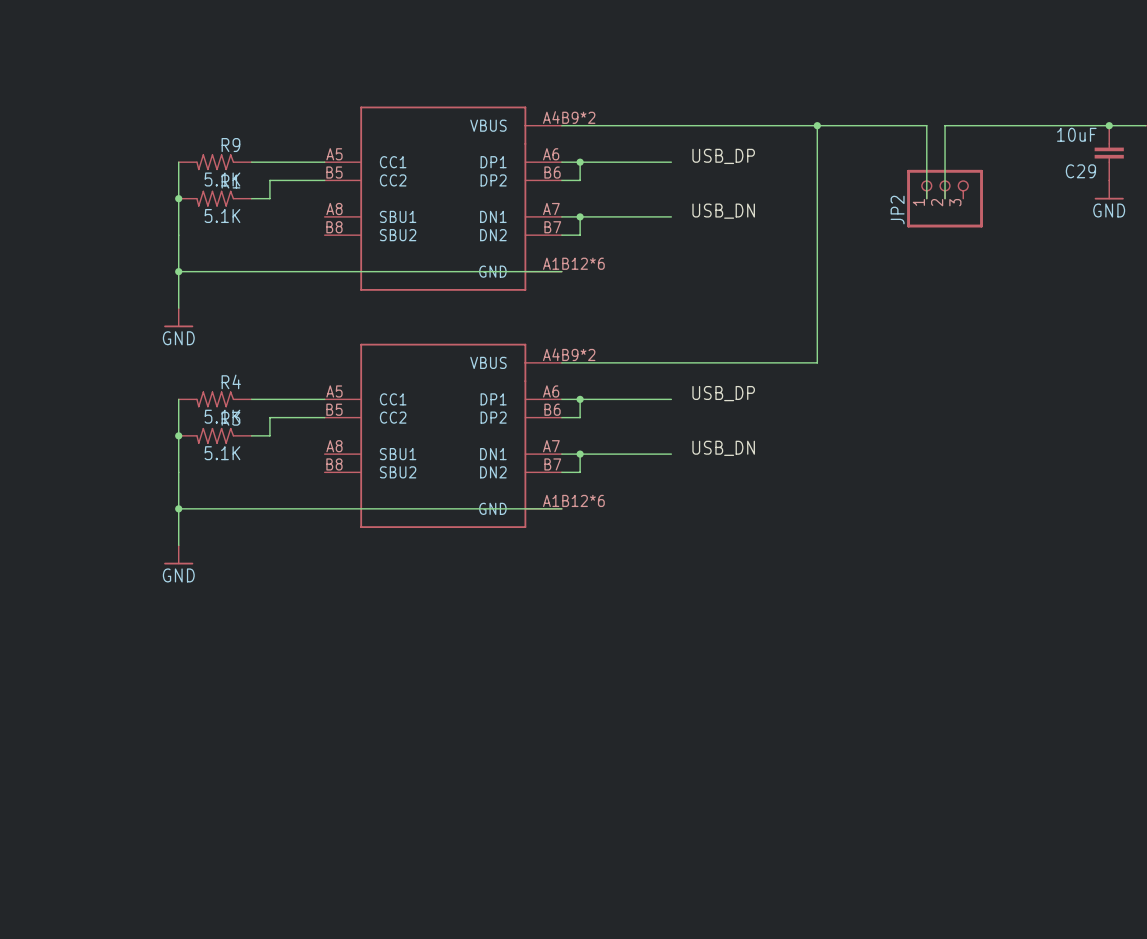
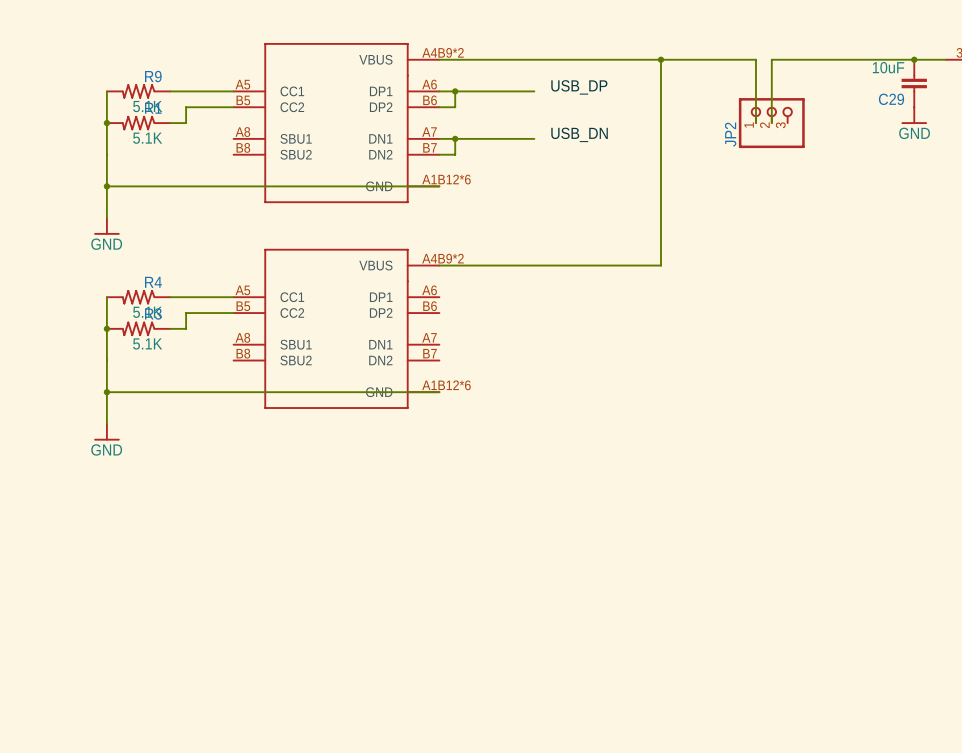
label: USB_DP (723, 393) -> none
wire: (561, 399) (671, 399) -> none
wire: (580, 399) (580, 417) (561, 417) -> none
junction: (580, 399) -> none
label: USB_DN (723, 448) -> none
wire: (561, 454) (671, 454) -> none
wire: (580, 454) (580, 472) (561, 472) -> none
junction: (580, 454) -> none

